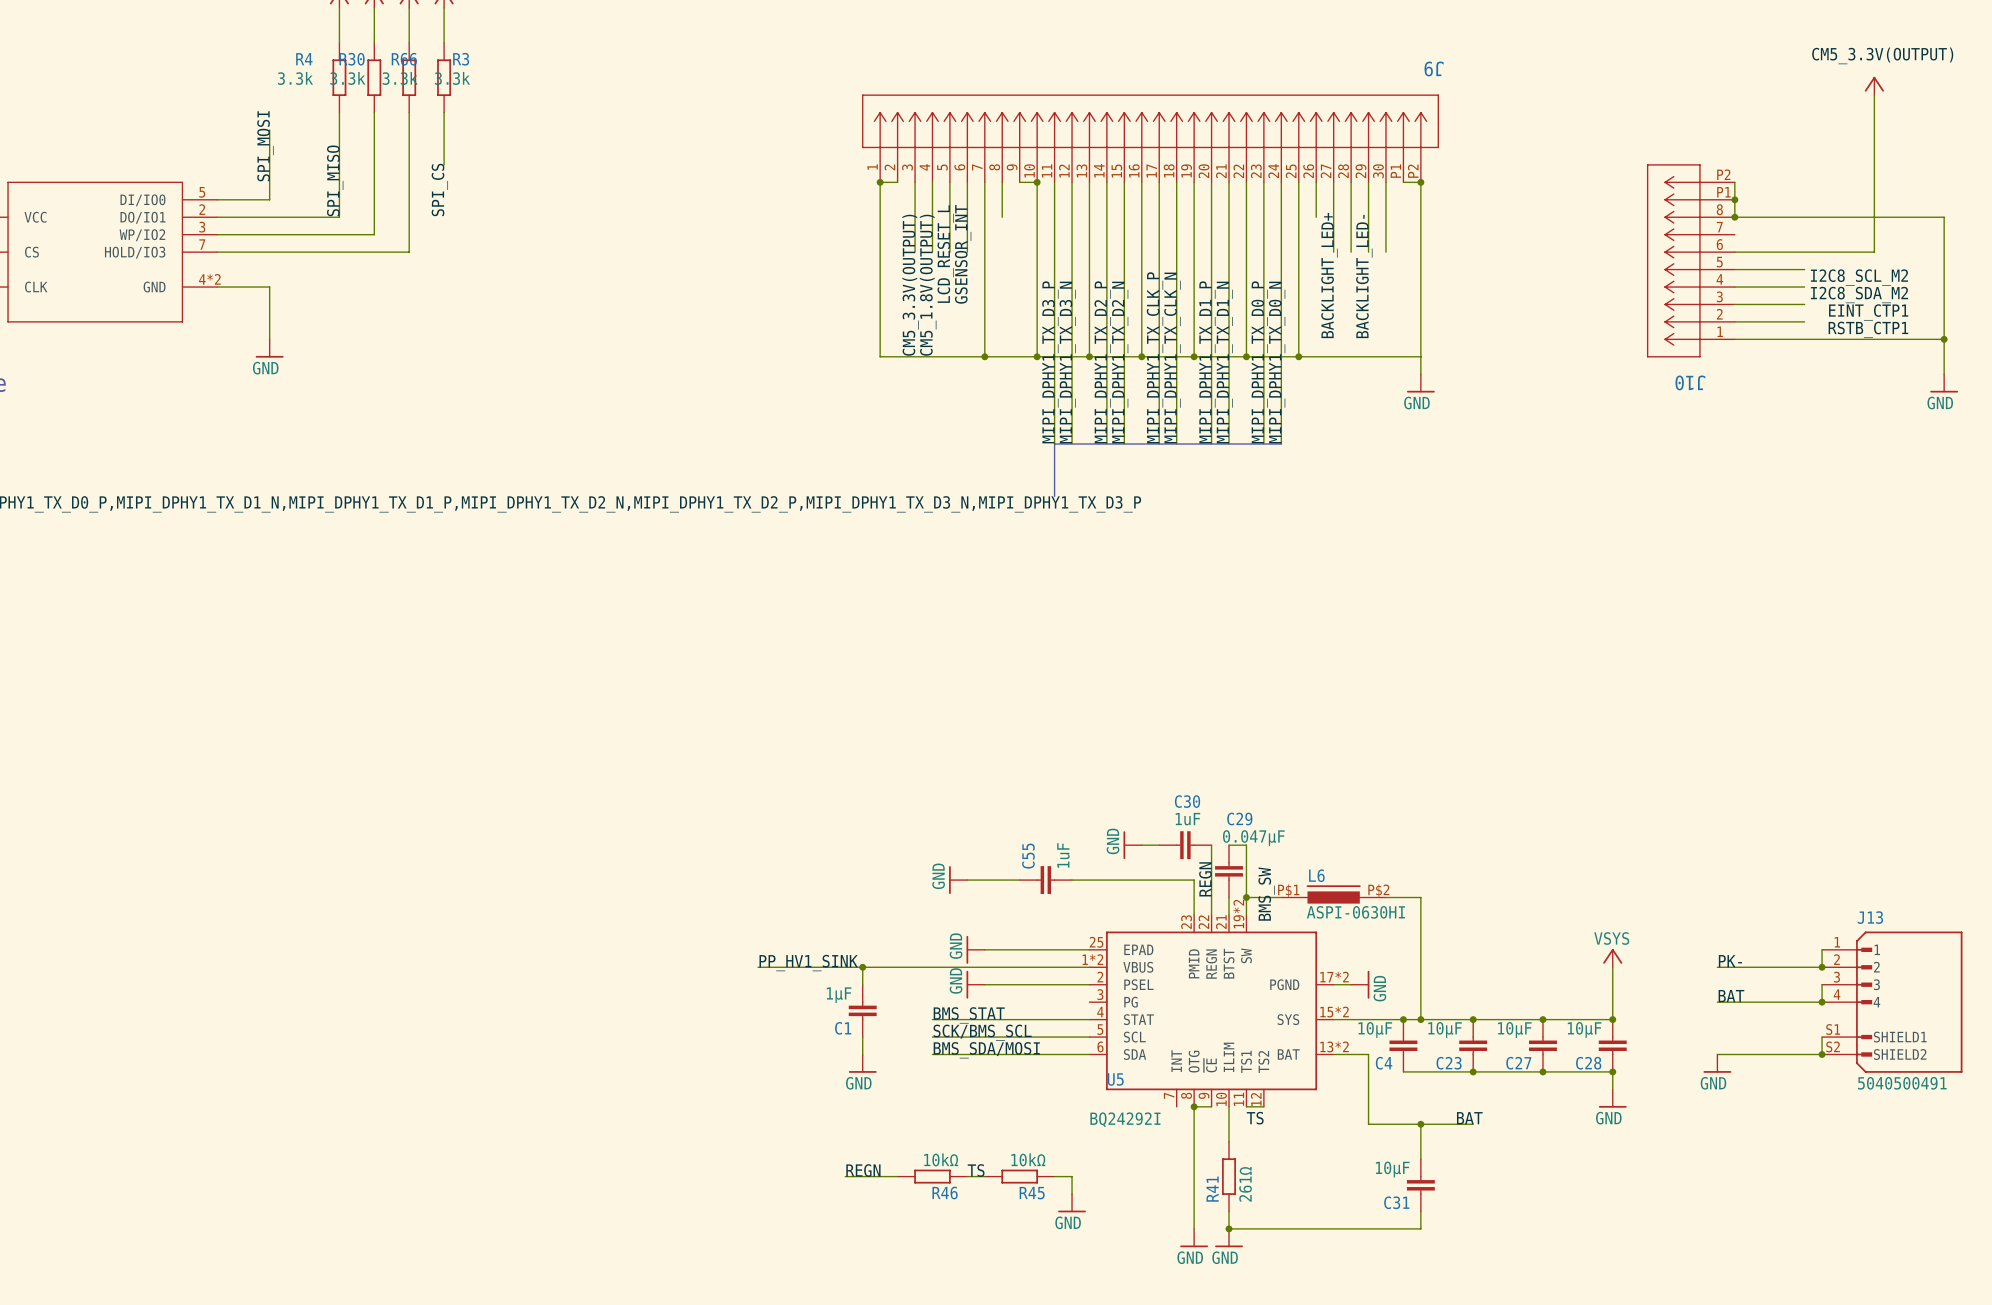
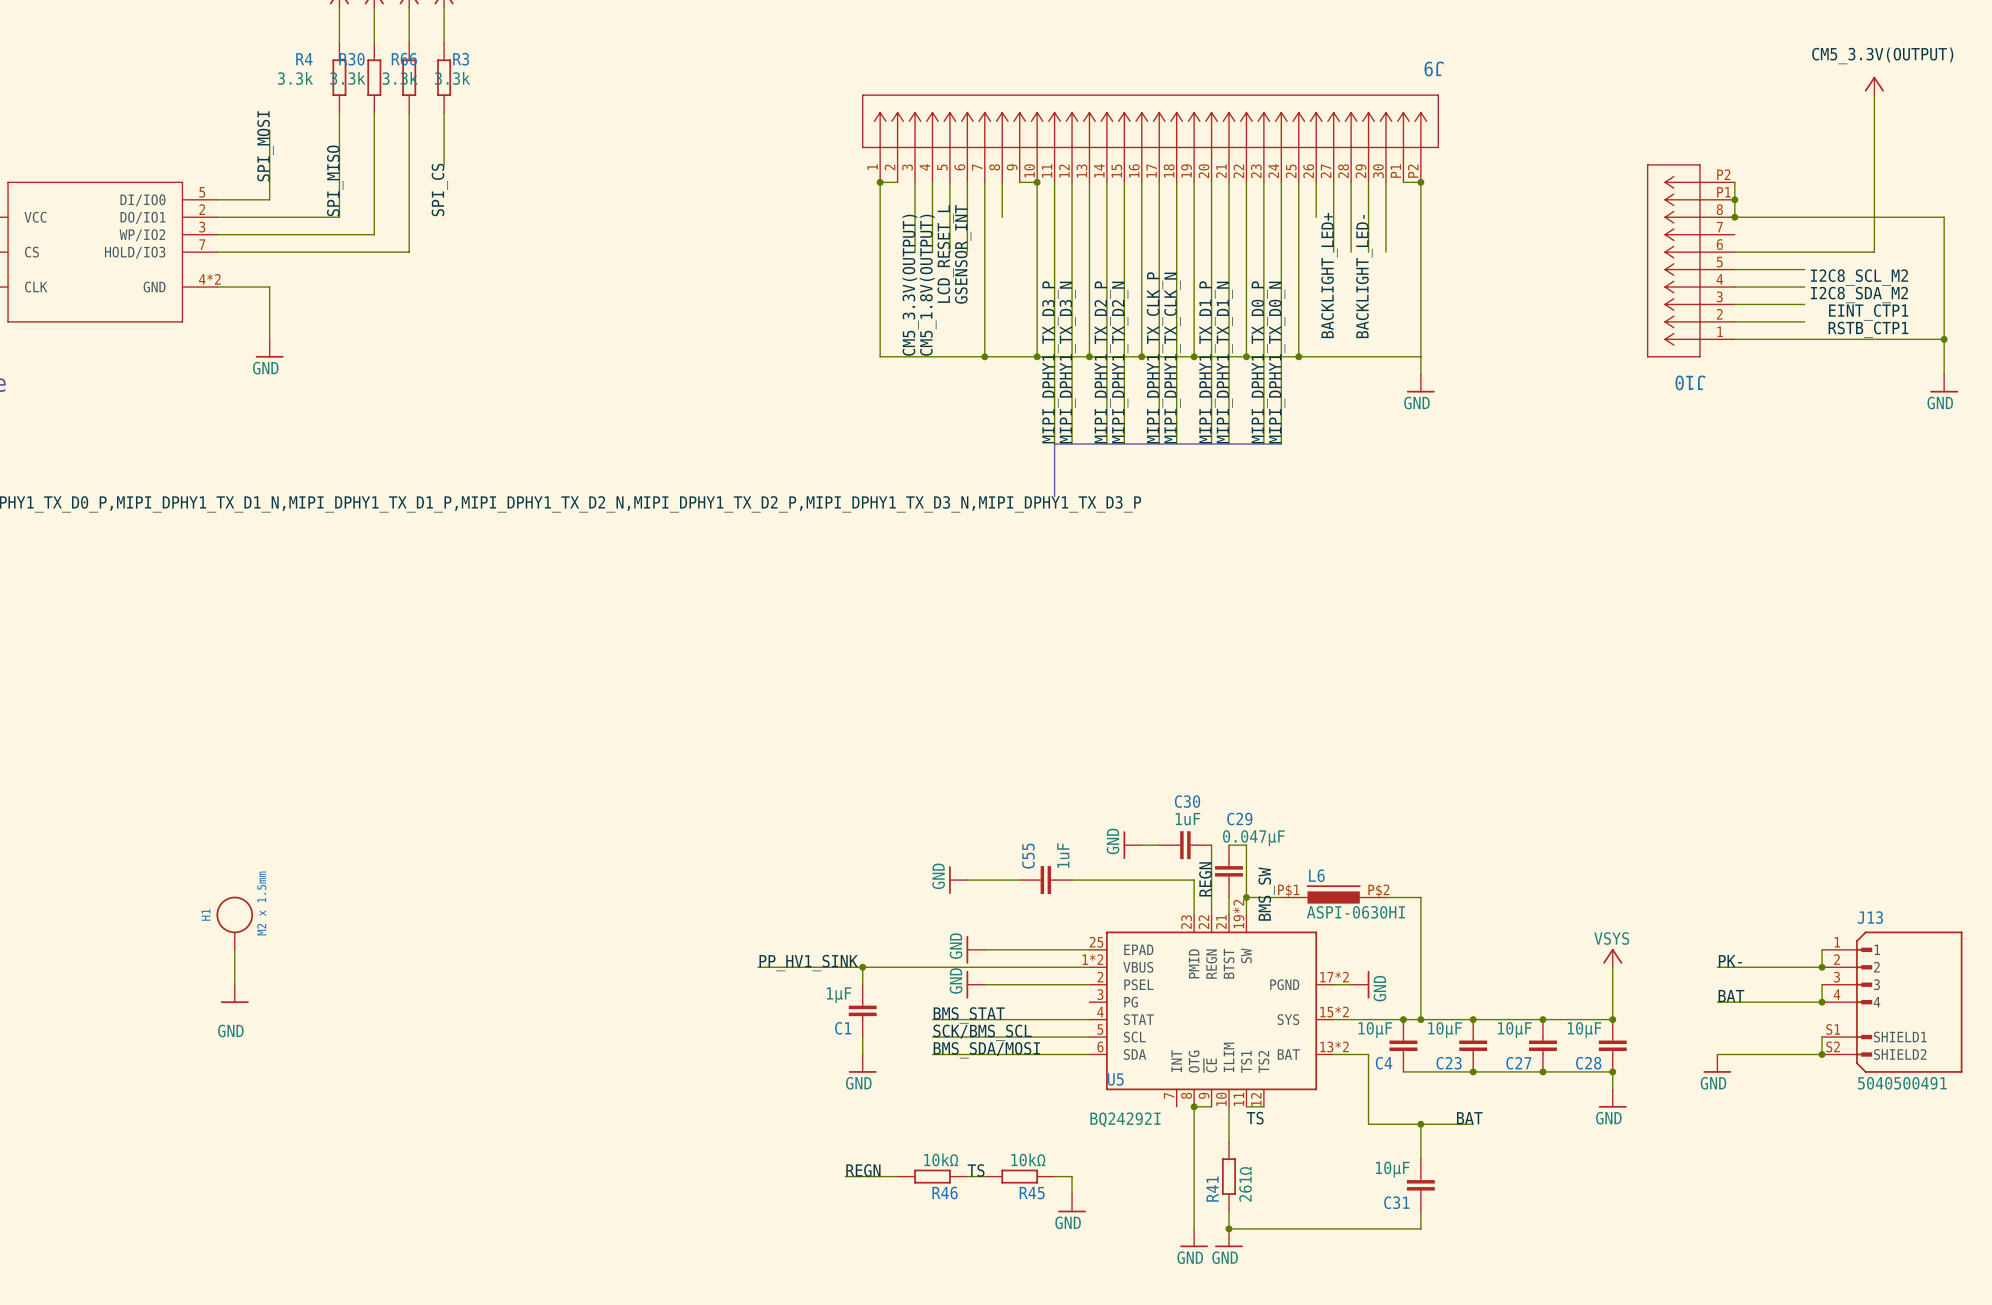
H1: none -> M2 x 1.5mm (234, 923)
wire: none -> (234, 949) (234, 984)
power symbol: none -> GND (234, 993)

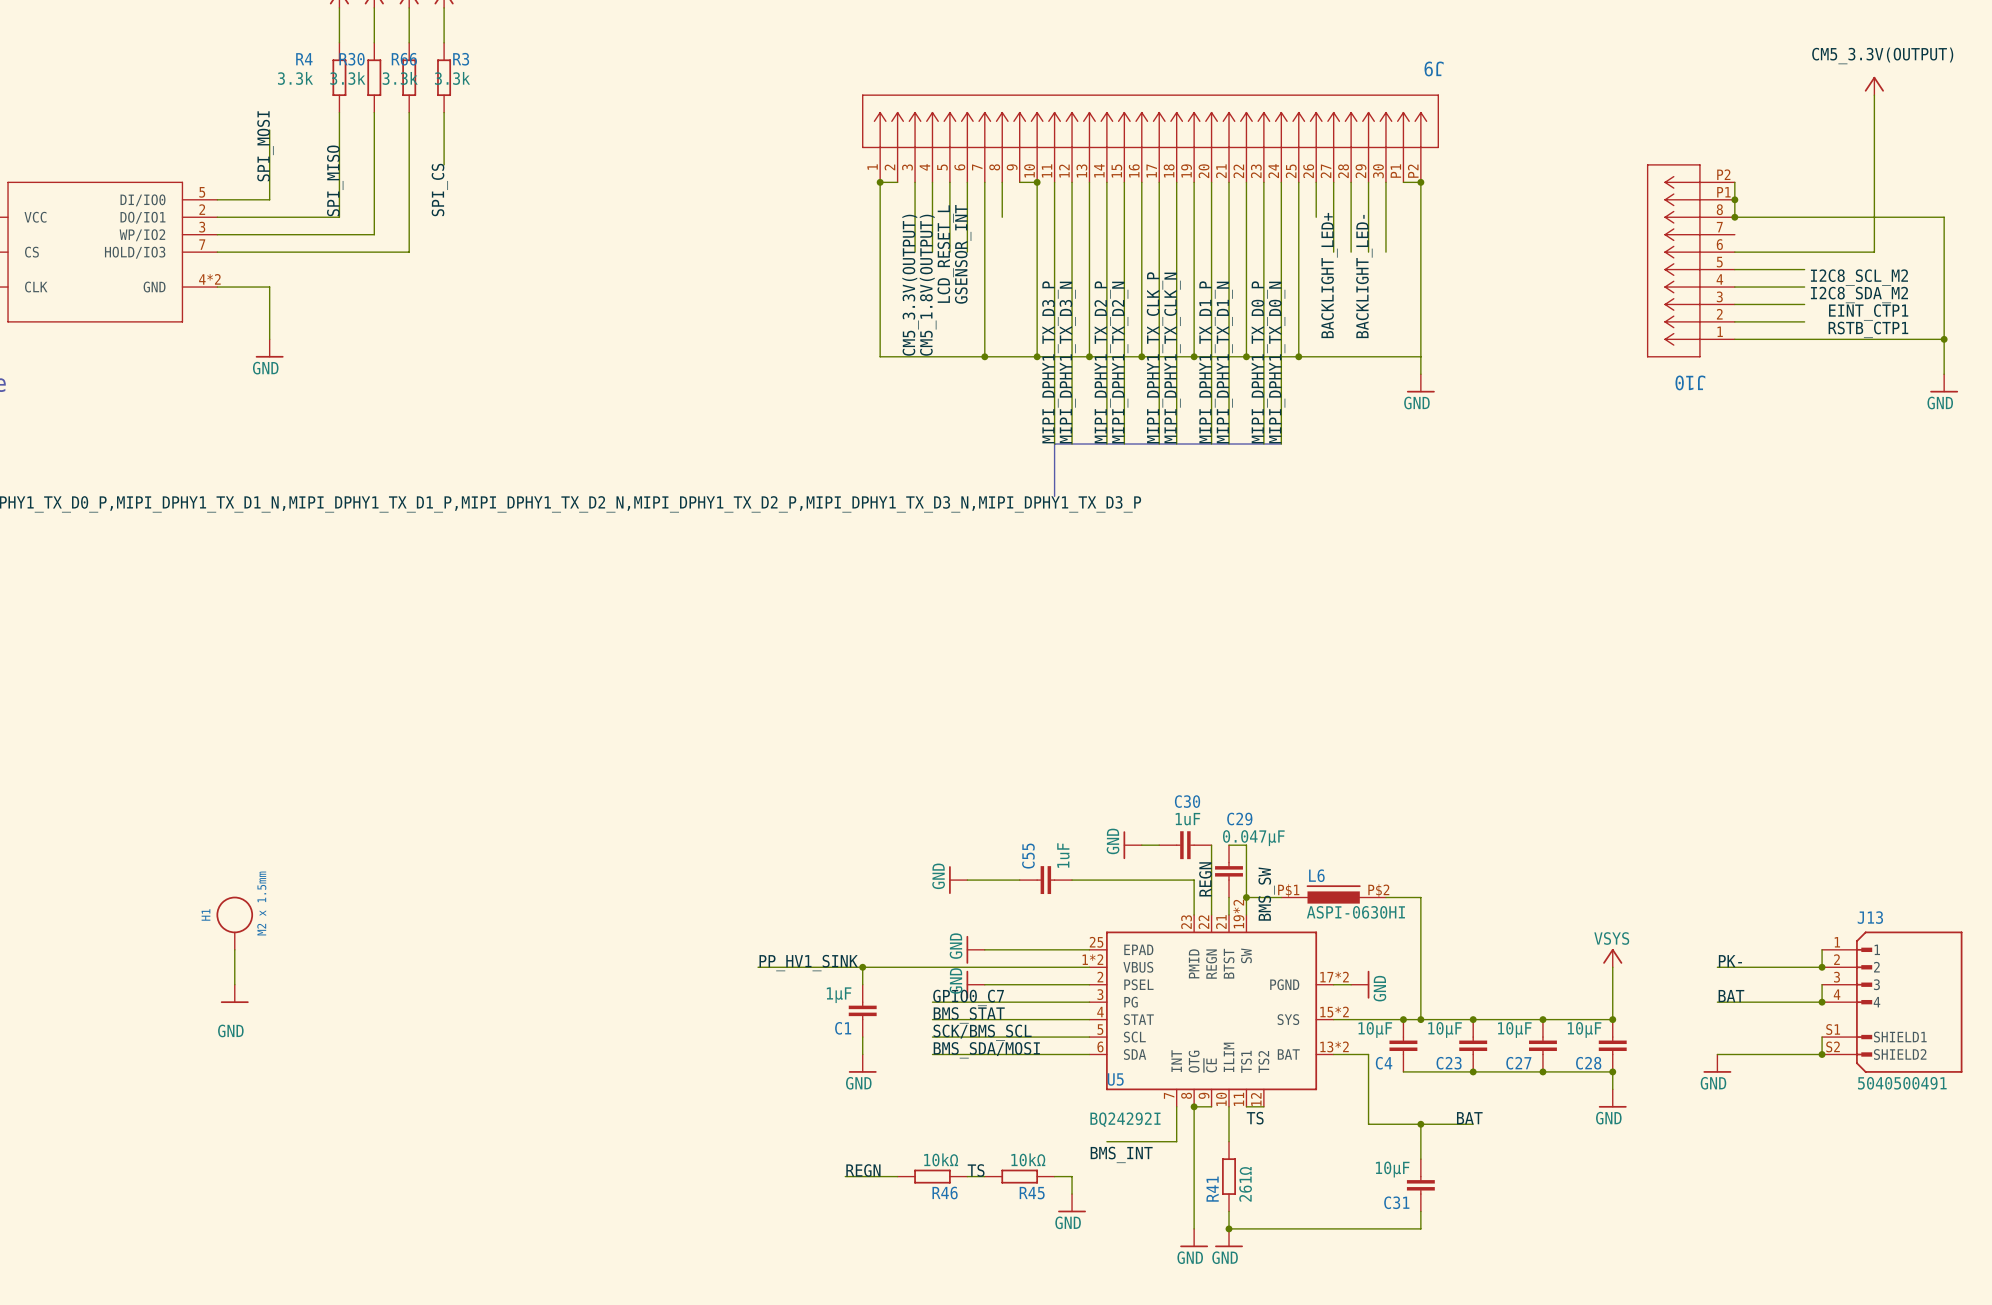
label: none -> GPIO0_C7 (968, 997)
wire: none -> (932, 1002) (1089, 1002)
wire: none -> (1176, 1106) (1176, 1141) (1106, 1141)
label: none -> BMS_INT (1121, 1154)

